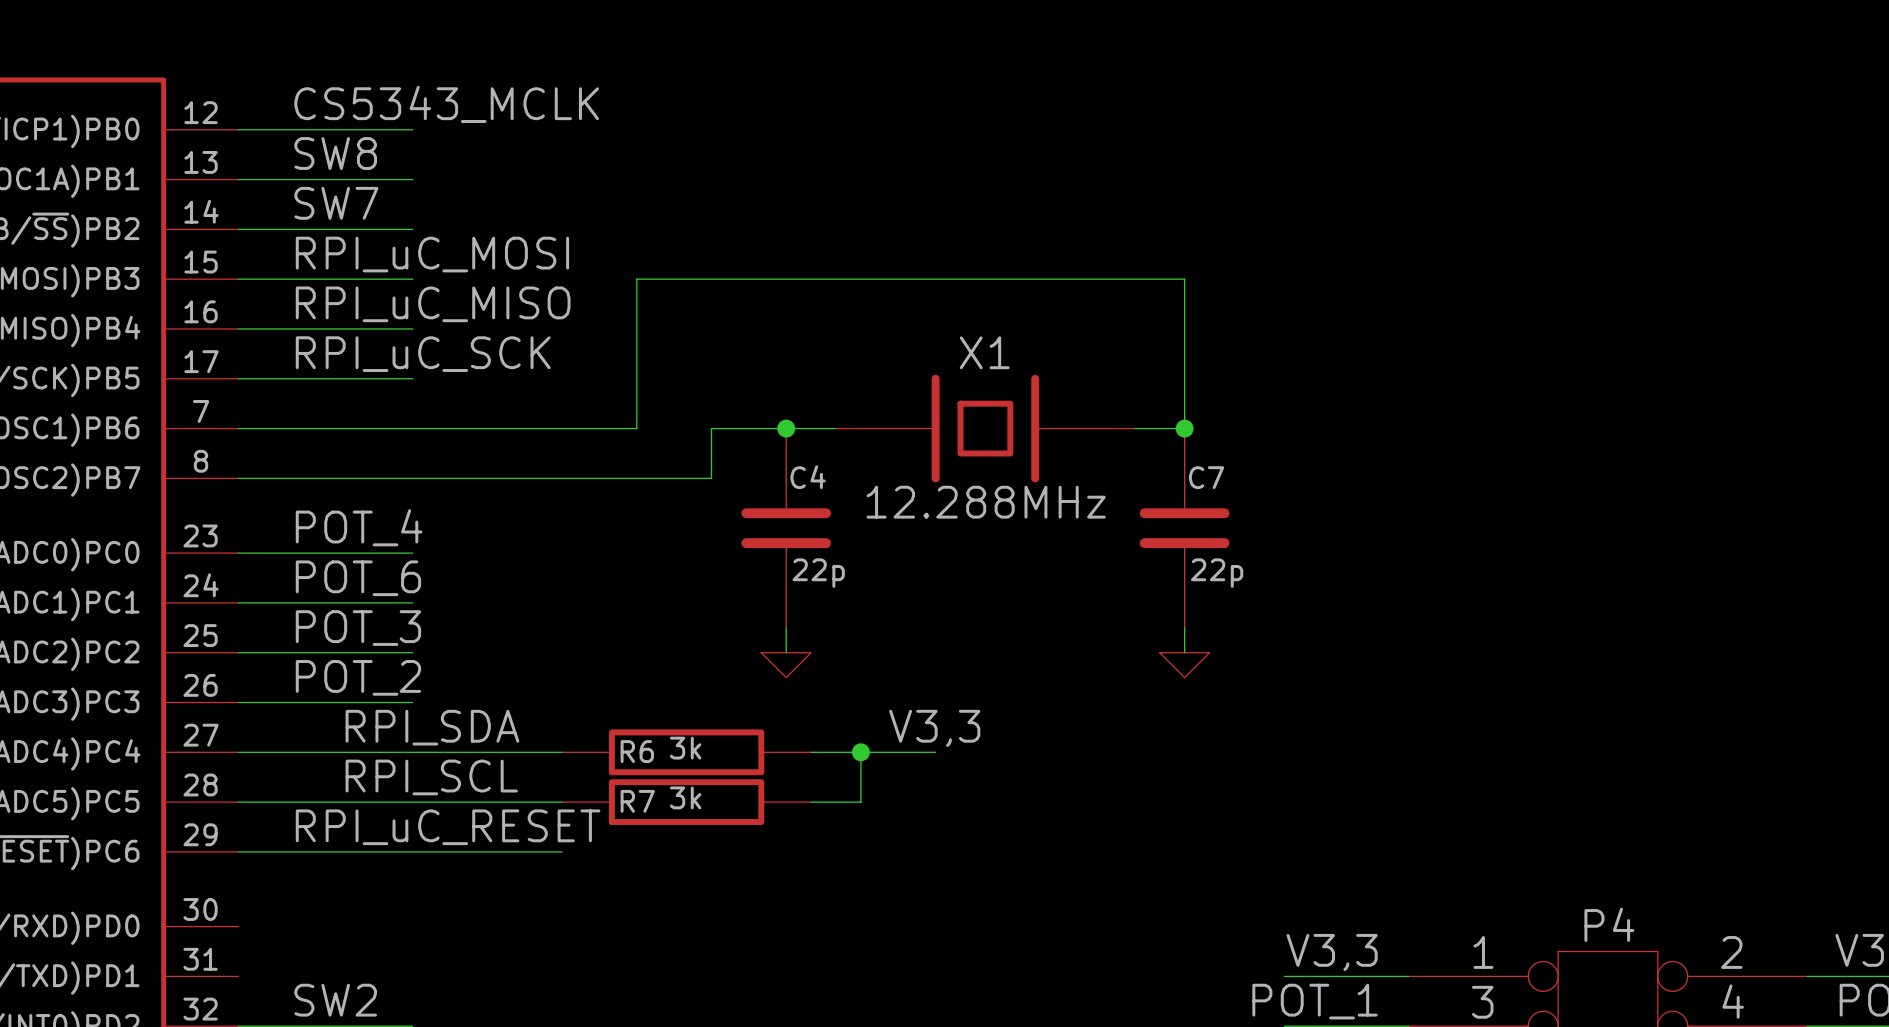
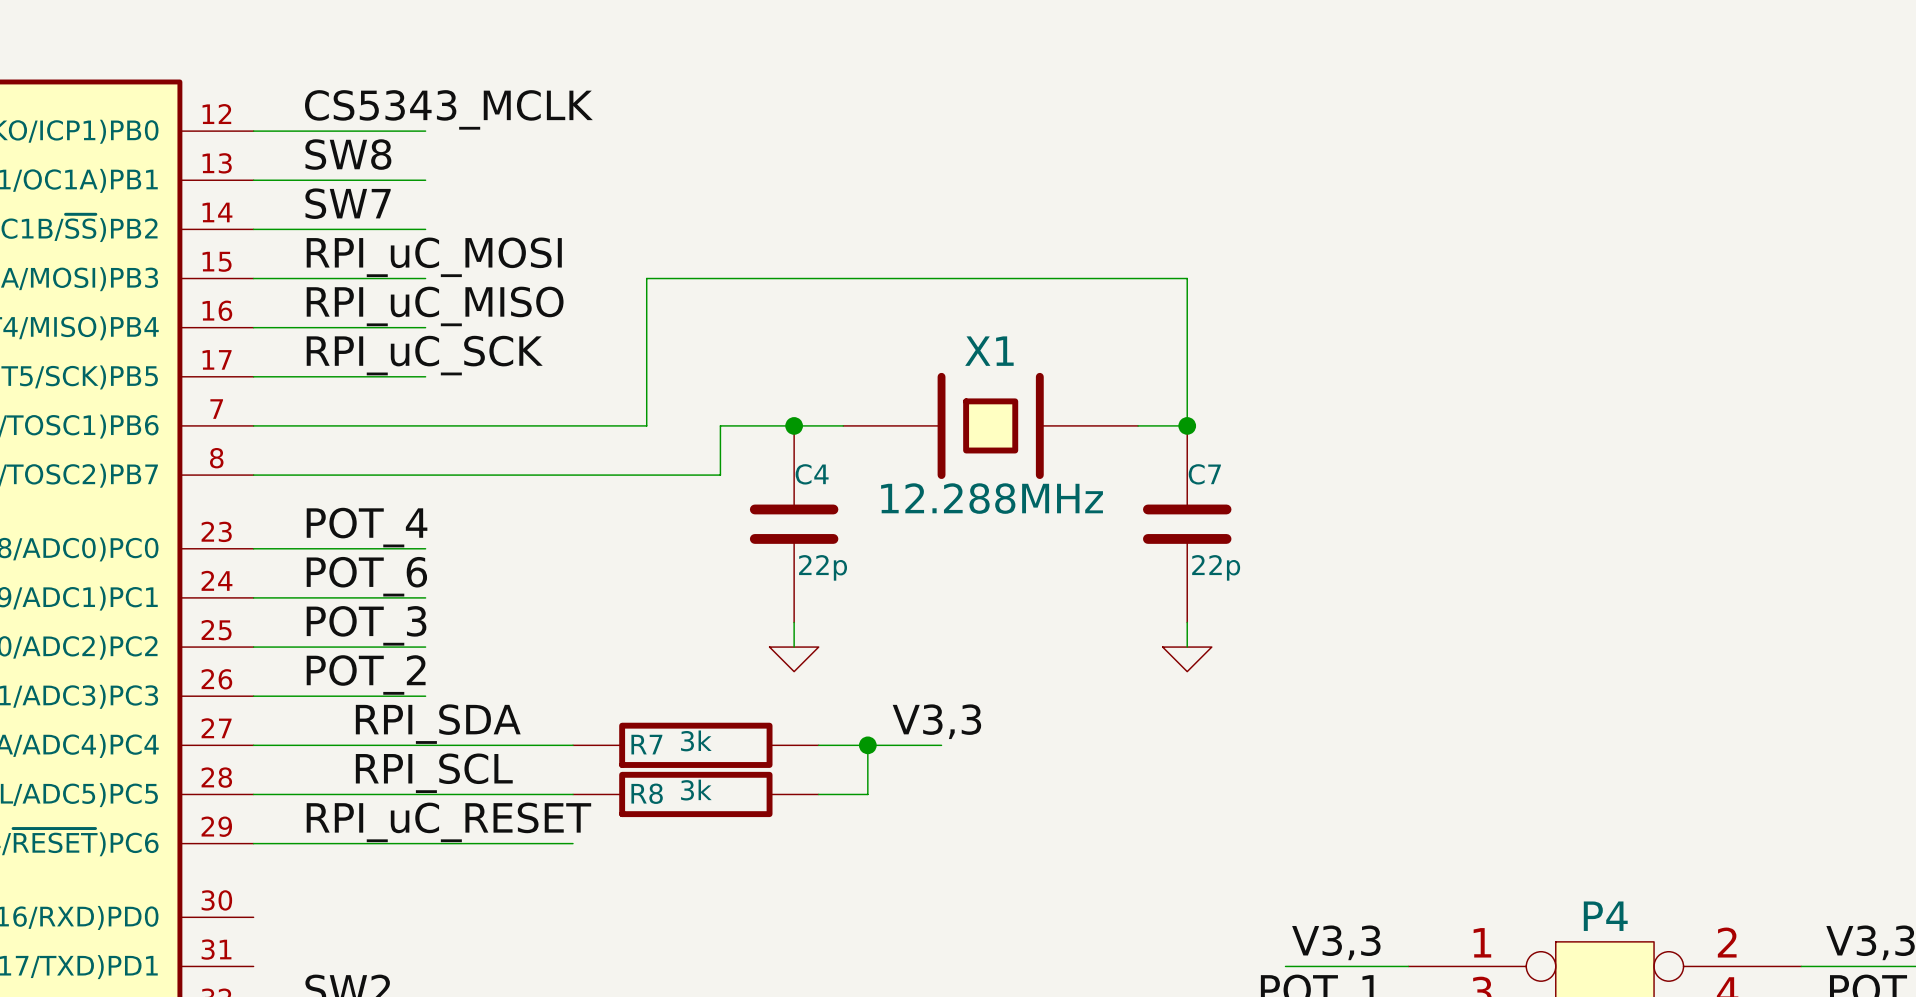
R6 name: R6 (637, 751) -> R7 (646, 744)
R7 name: R7 (637, 801) -> R8 (647, 793)

